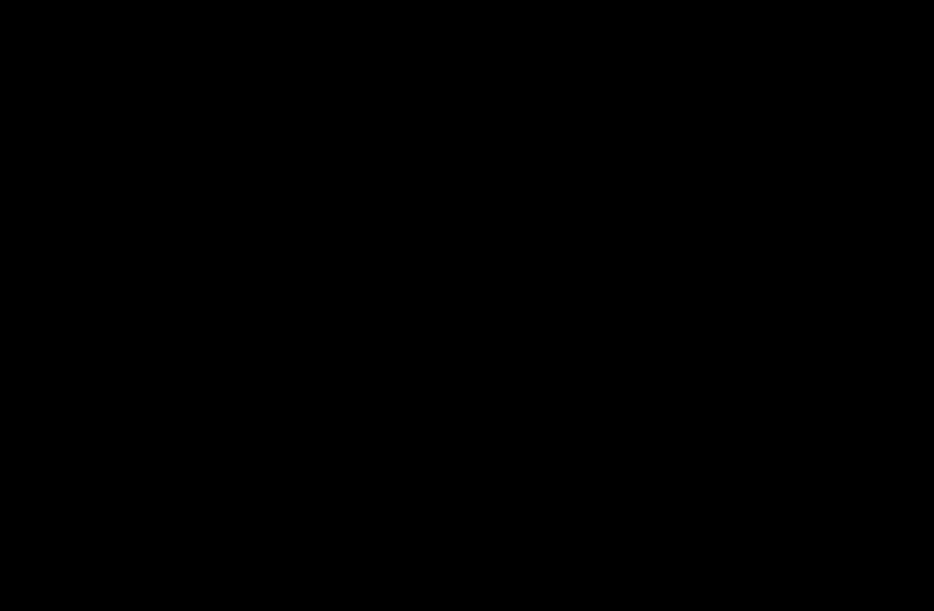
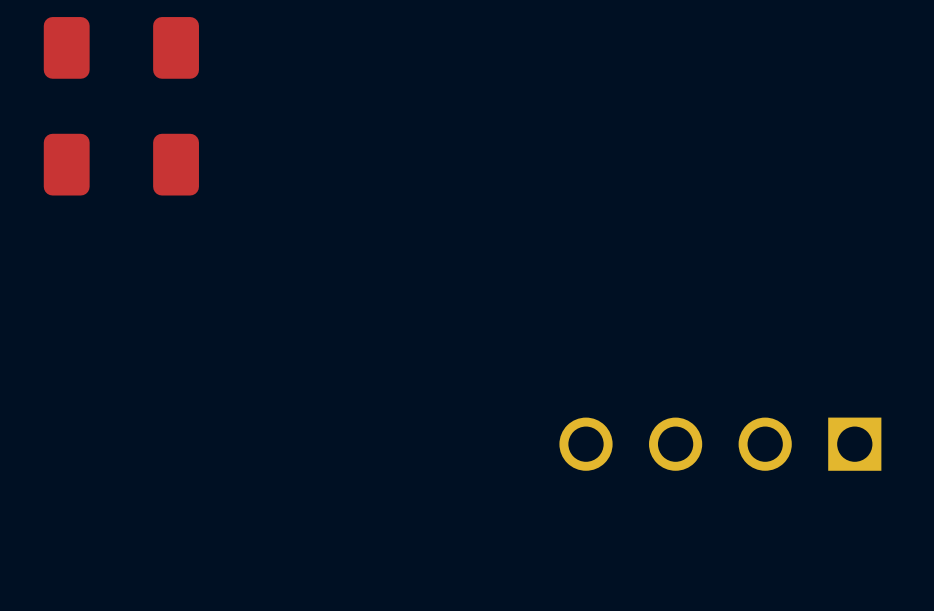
part: none -> (121, 47)
part: none -> (121, 164)
part: none -> (720, 444)

